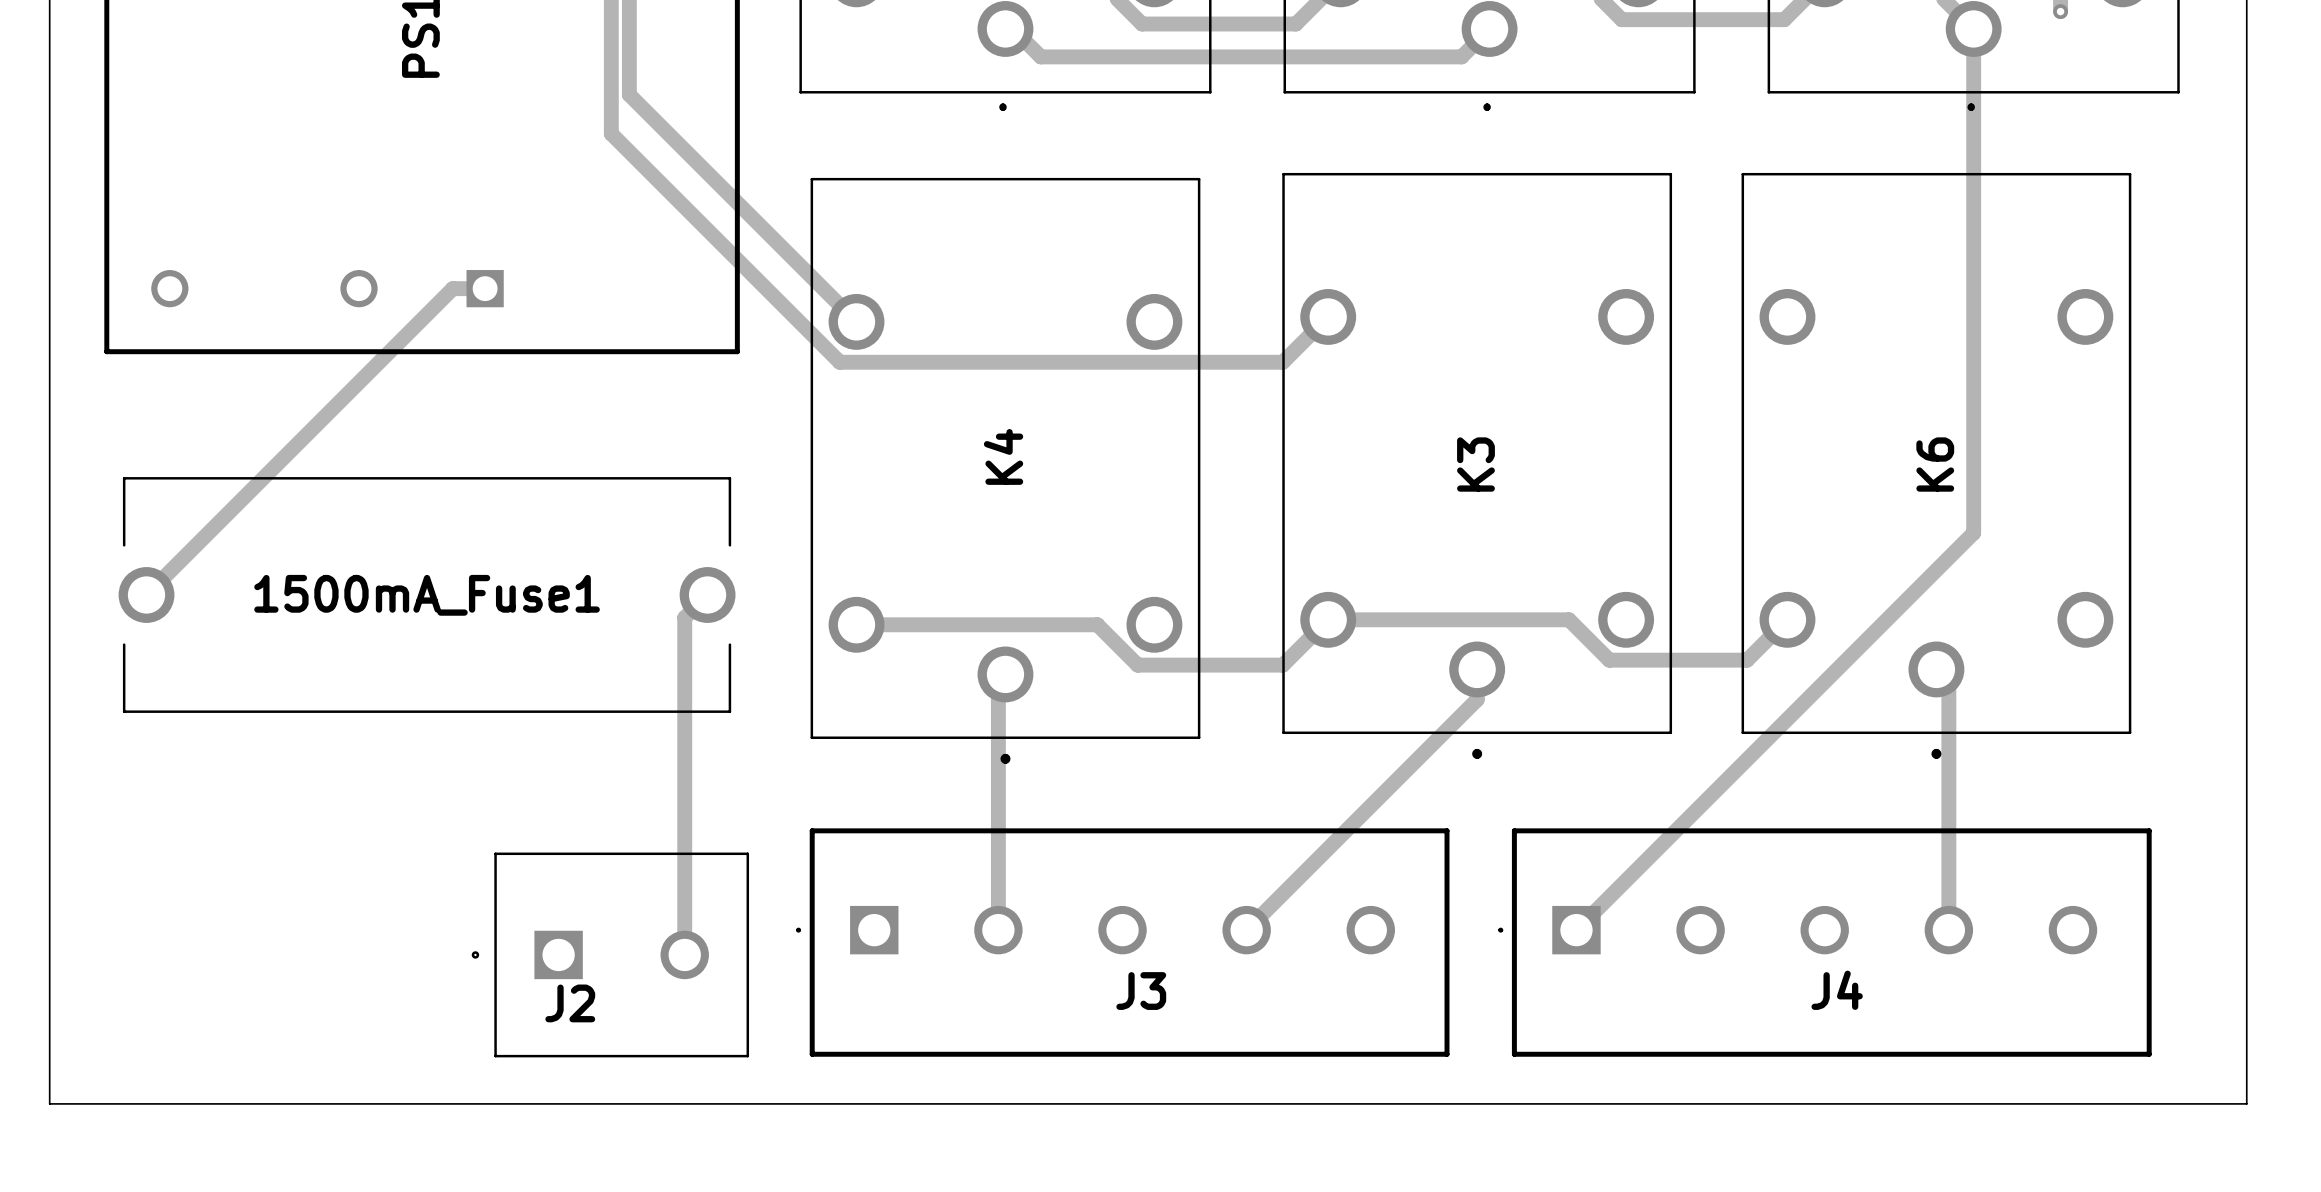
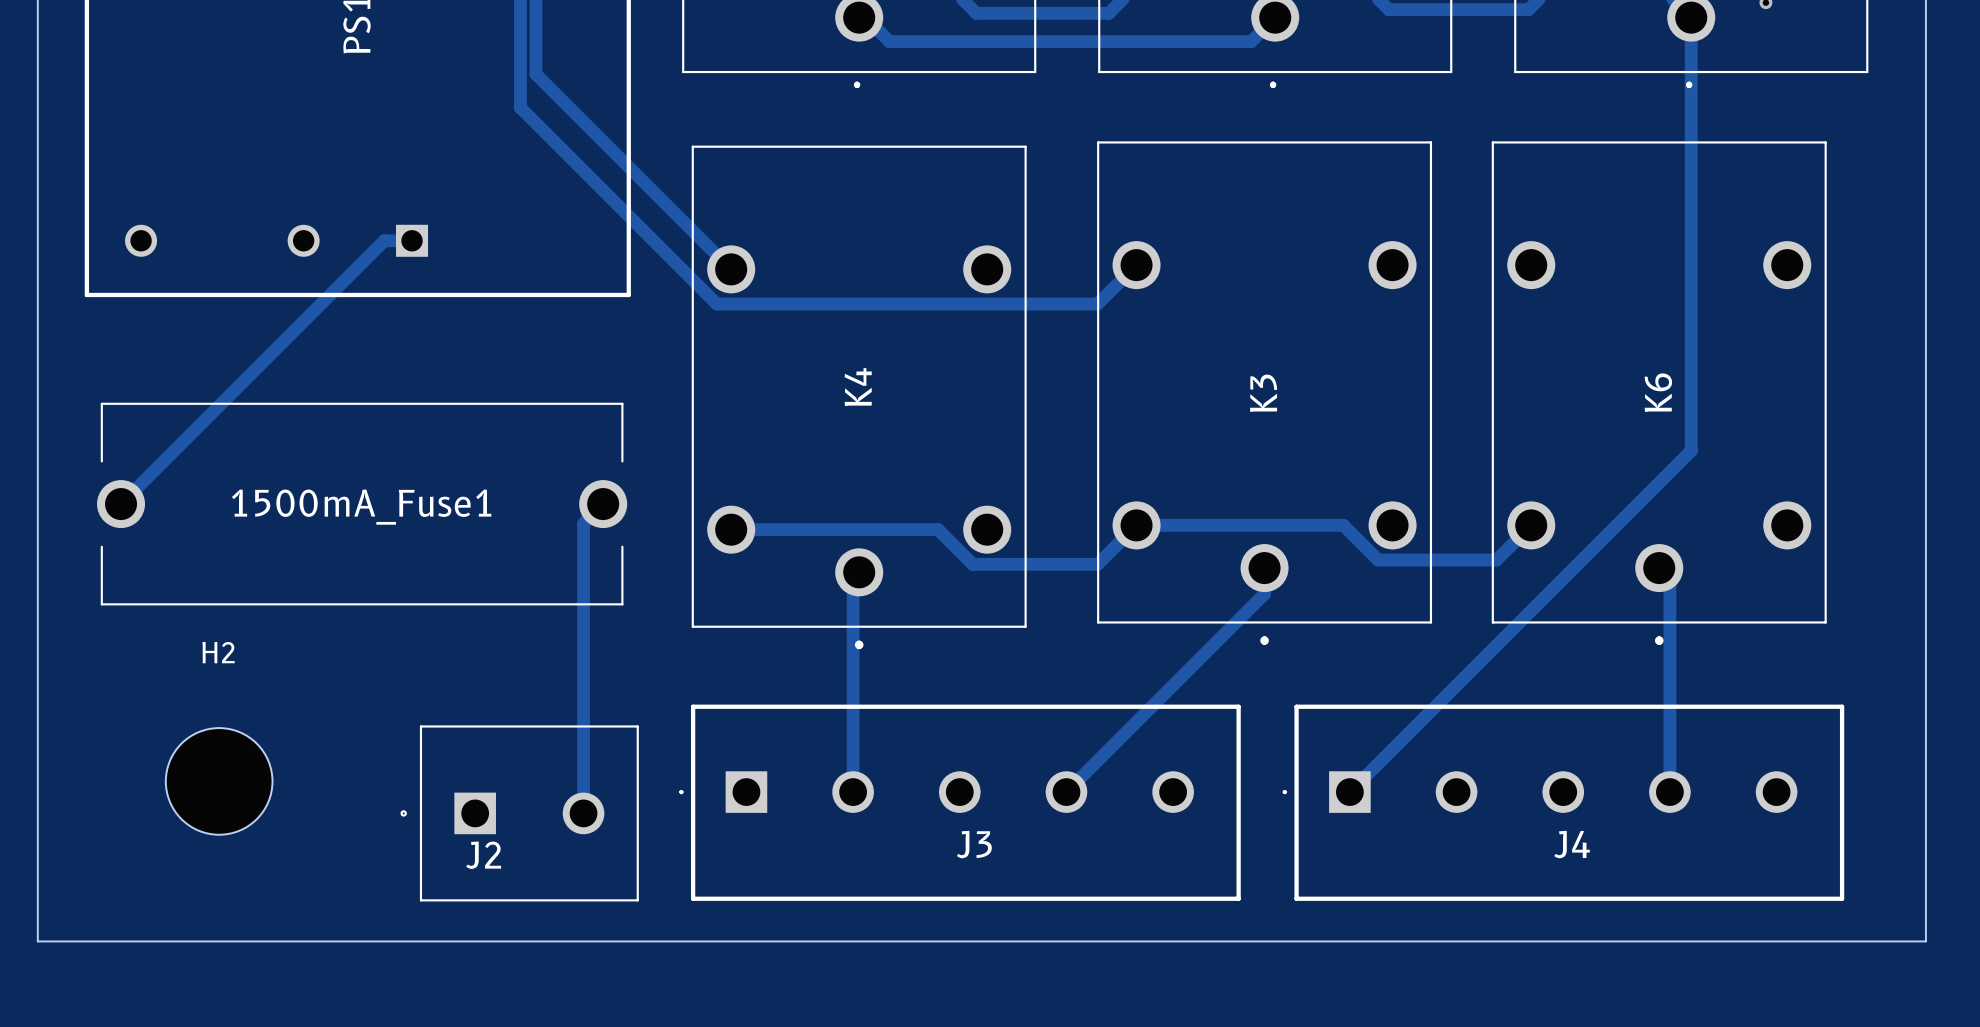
H2: none -> (219, 781)

